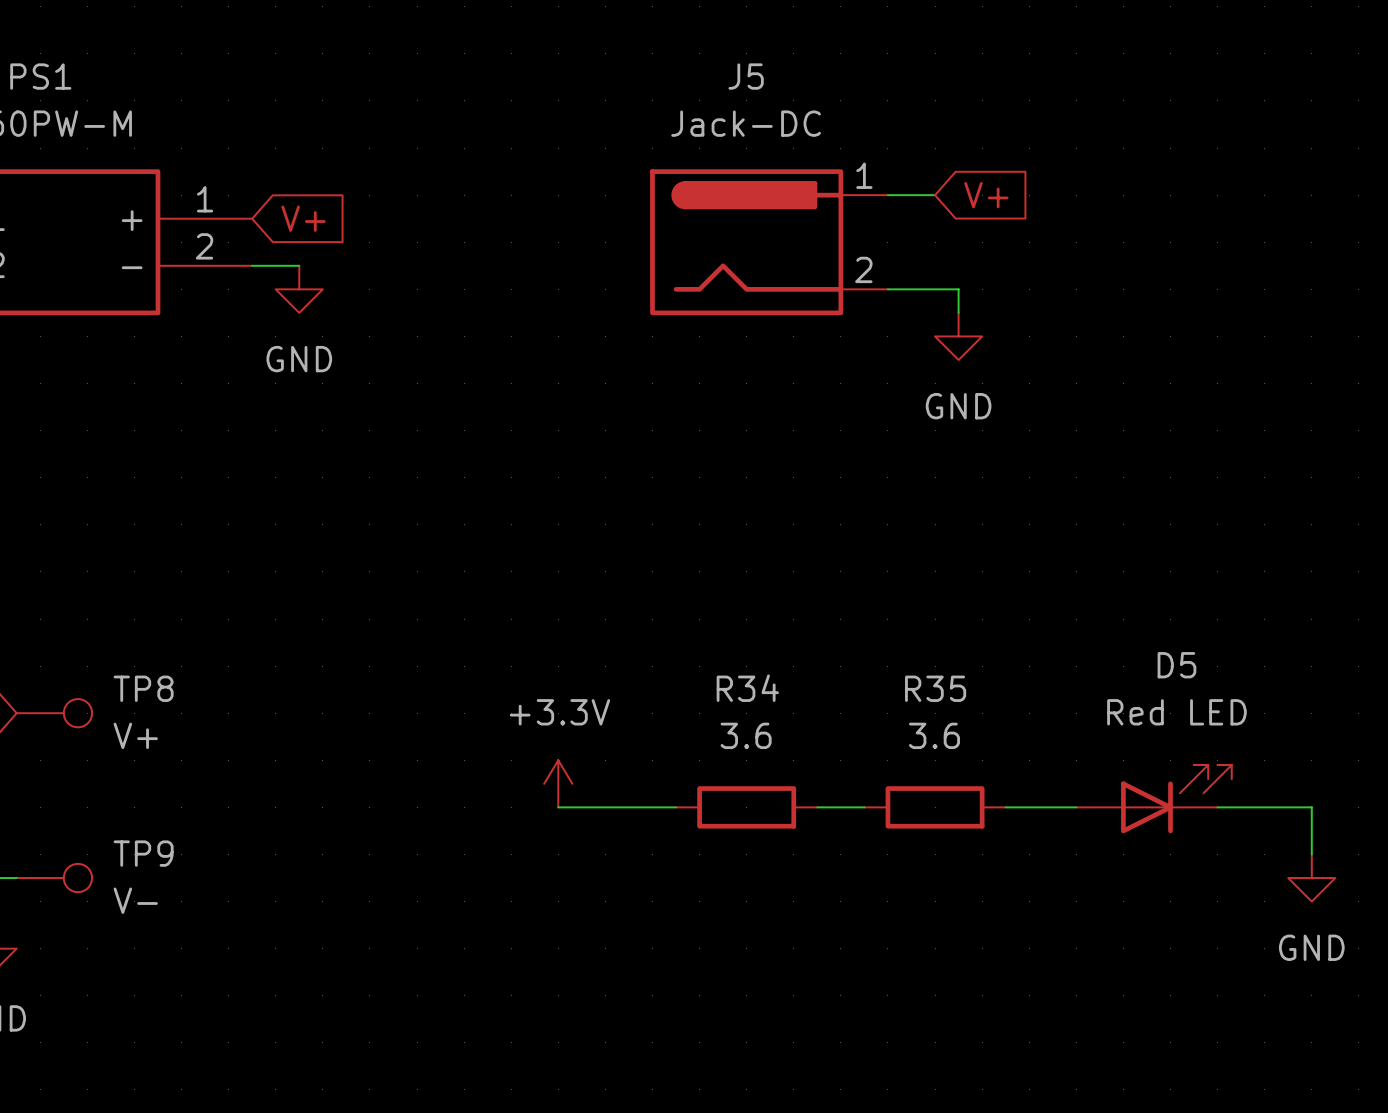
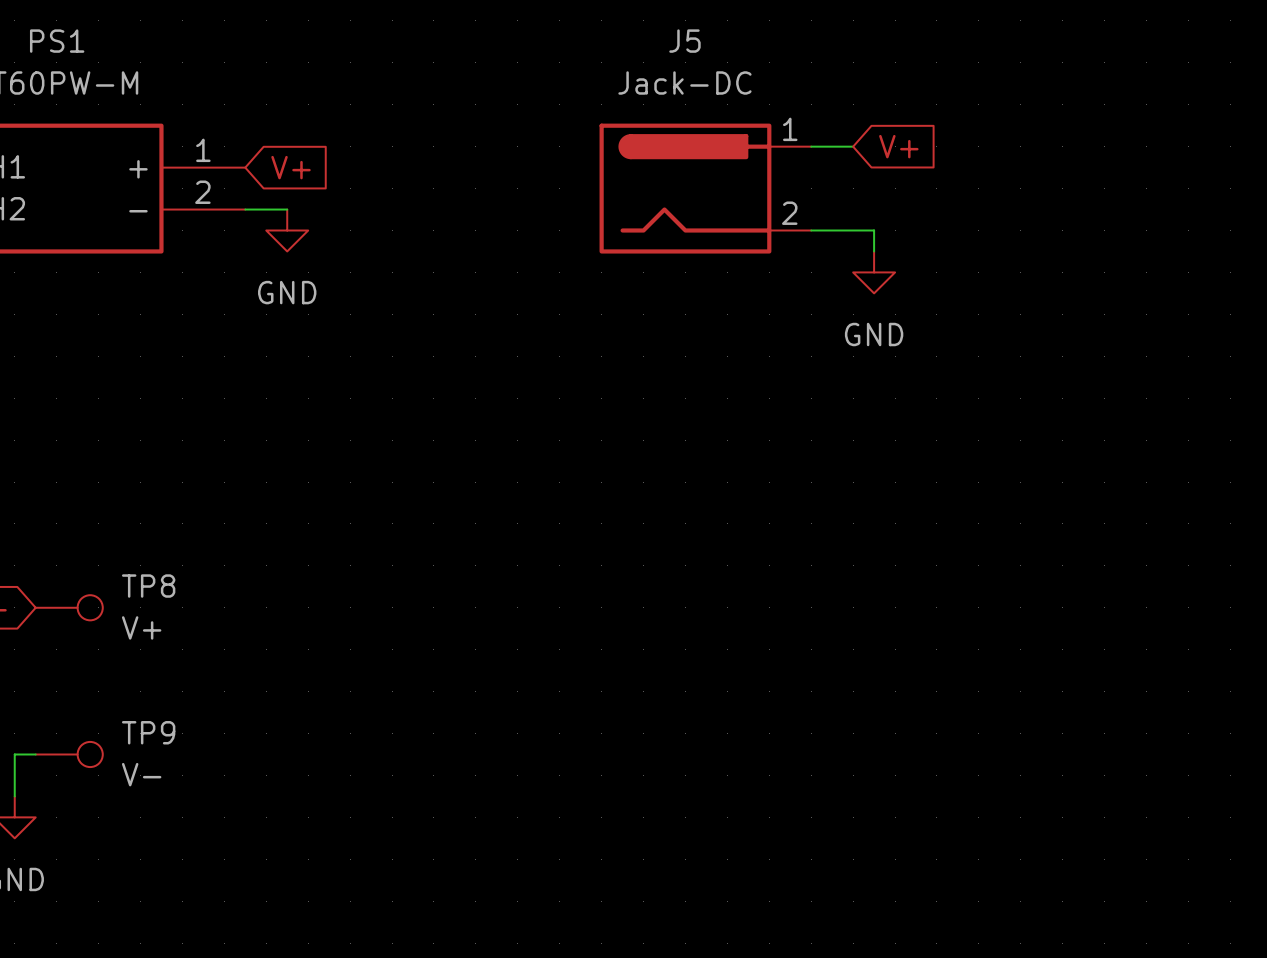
power symbol: +3.3V (558, 783) -> none
D5: Red LED (1154, 799) -> none
wire: (558, 807) (676, 807) -> none
R34: 3.6 (746, 807) -> none
wire: (817, 807) (864, 807) -> none
R35: 3.6 (935, 807) -> none
wire: (1005, 807) (1076, 807) -> none
wire: (1217, 807) (1311, 807) (1311, 854) -> none
power symbol: GND (1311, 878) -> none

